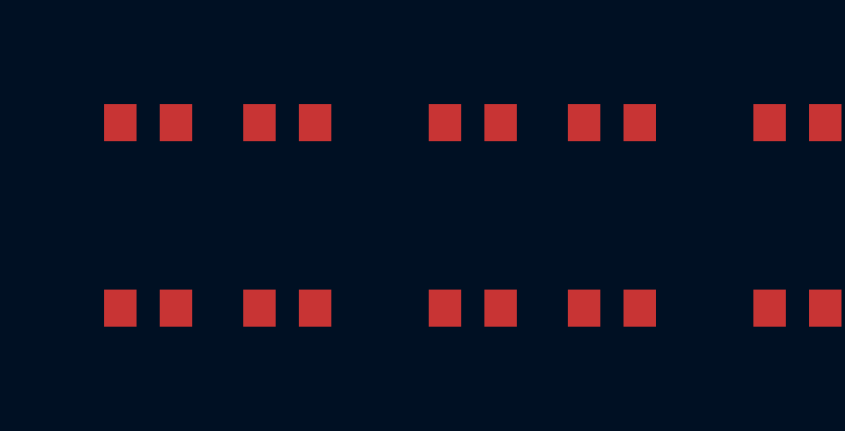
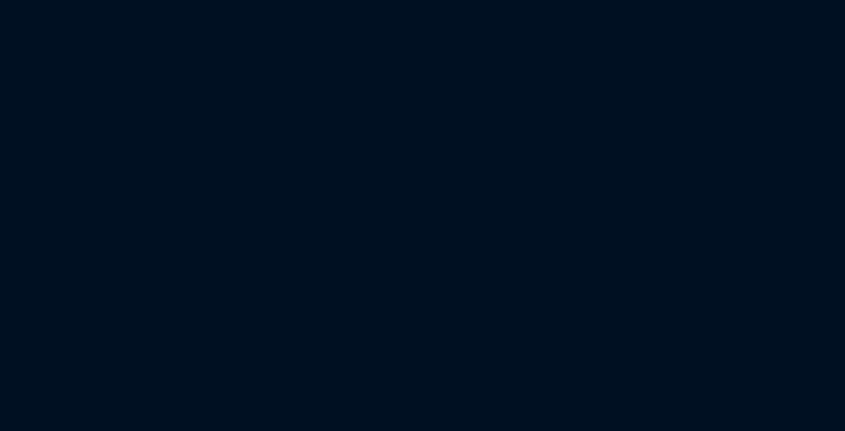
part: (148, 122) -> none
part: (287, 122) -> none
part: (472, 122) -> none
part: (611, 122) -> none
part: (797, 122) -> none
part: (148, 308) -> none
part: (287, 308) -> none
part: (472, 308) -> none
part: (611, 308) -> none
part: (797, 308) -> none

